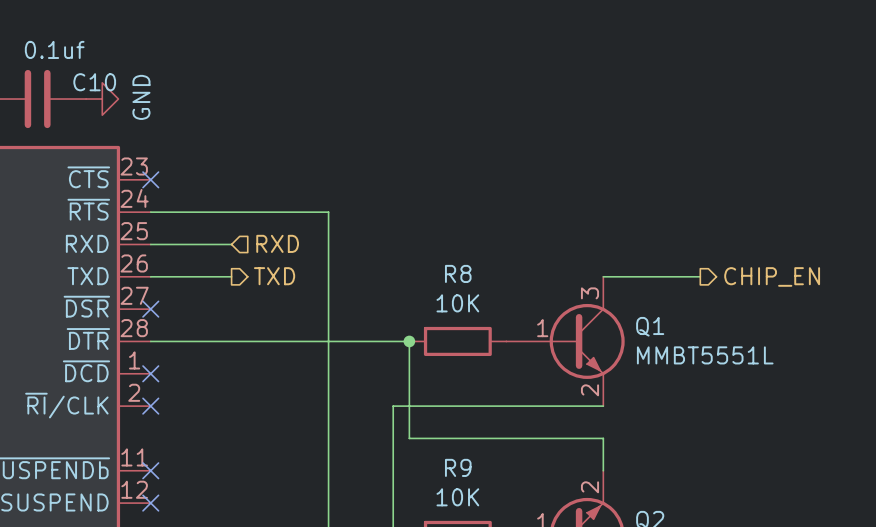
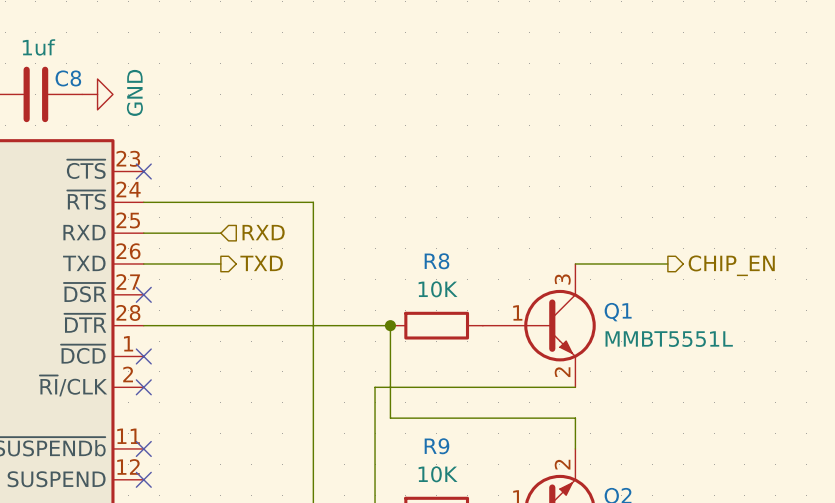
C10 value: 0.1uf (54, 49) -> 1uf (38, 47)
C10 name: C10 (94, 82) -> C8 (68, 78)

